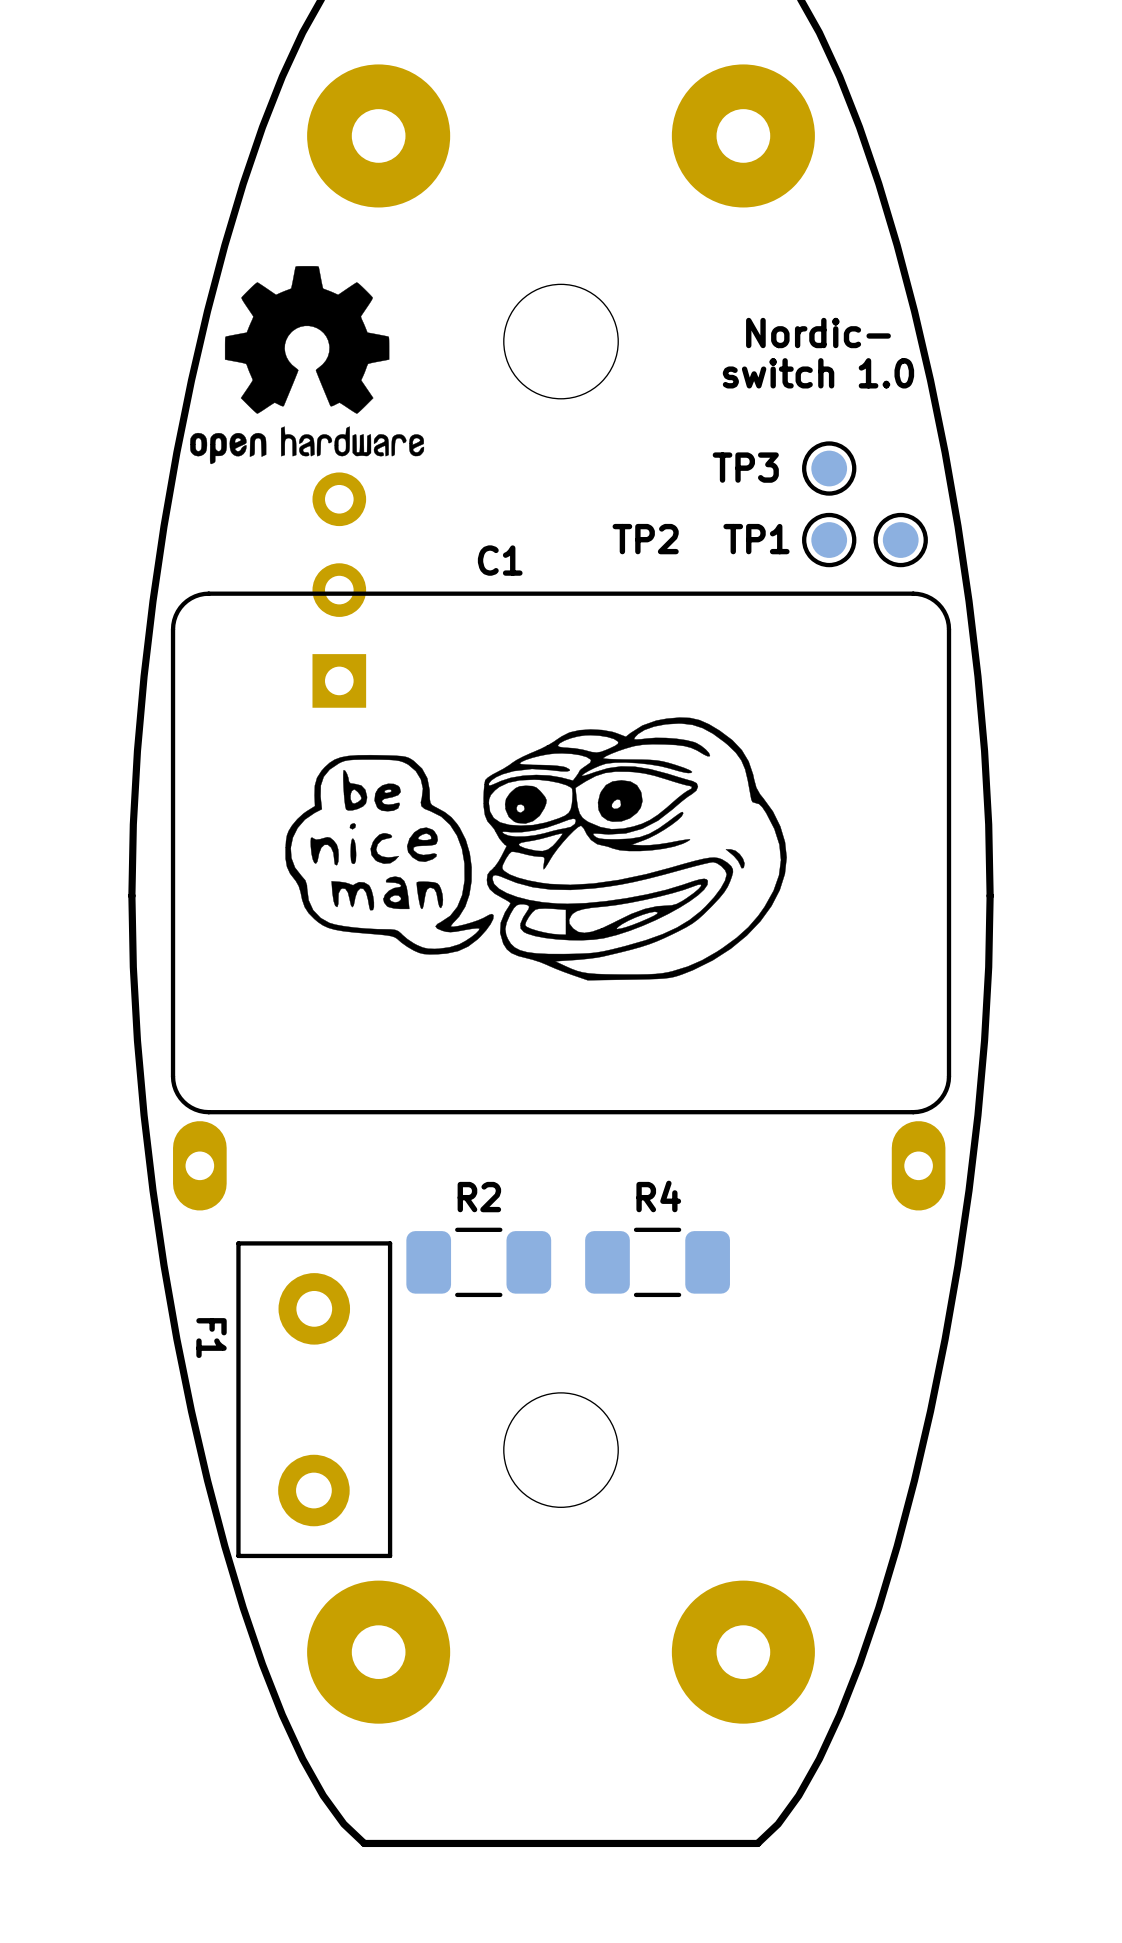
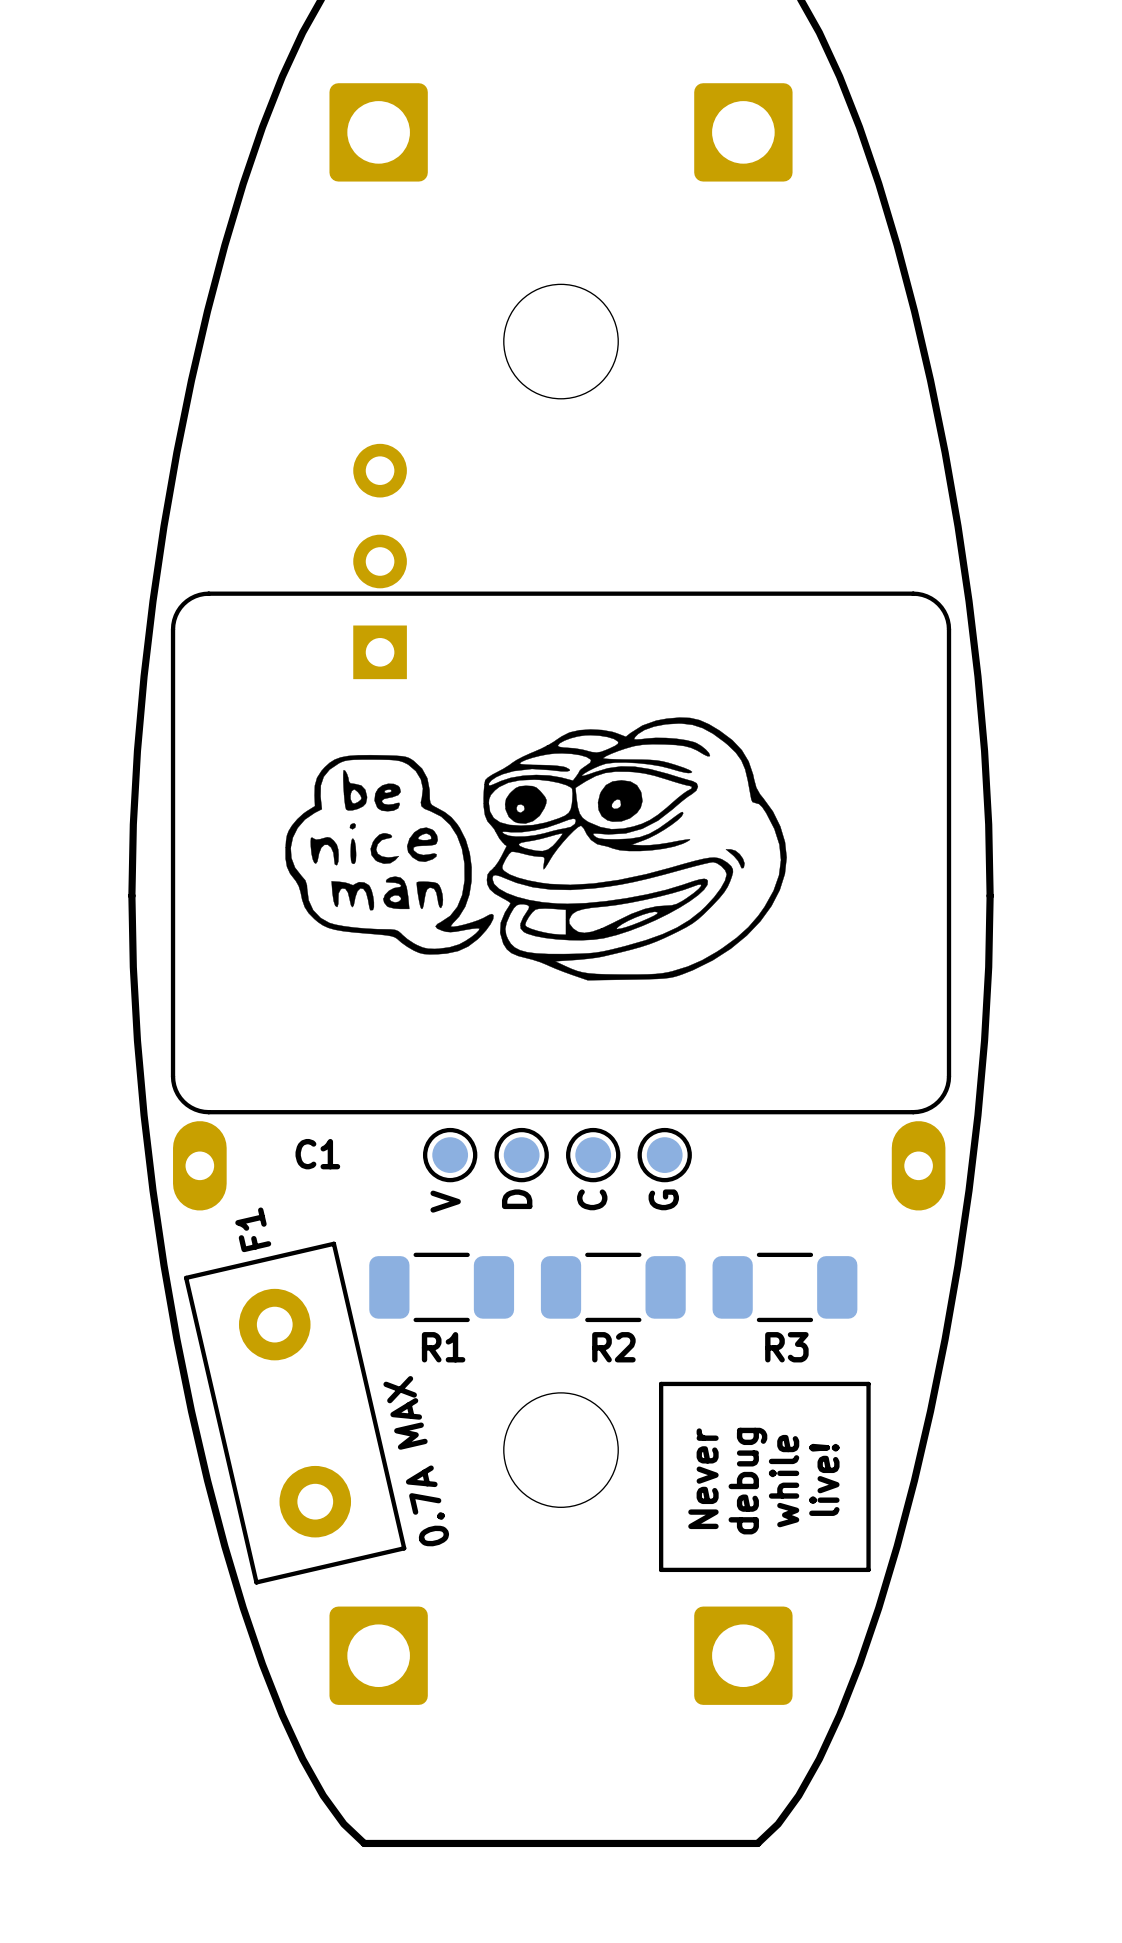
part footprint: [307, 64, 451, 208] -> [329, 83, 428, 182]
part footprint: [671, 64, 815, 208] -> [694, 83, 793, 182]
drawing: [190, 266, 425, 465] -> none
text: Nordic- (818, 333) -> none
text: switch 1.0 (818, 373) -> none
TP3: (829, 468) -> none
TP2: (829, 540) -> none
TP1: (900, 540) -> none
C1 name position: C1 (500, 560) -> C1 (317, 1154)
part position: (339, 590) -> (380, 561)
part: none -> (450, 1155)
part: none -> (521, 1155)
part: none -> (593, 1155)
part: none -> (664, 1155)
R2 name position: R2 (479, 1197) -> R2 (613, 1347)
text: none -> D (517, 1199)
text: none -> C (592, 1199)
text: none -> G (663, 1199)
text: none -> V (445, 1201)
R2 footprint: [406, 1227, 552, 1298] -> [540, 1252, 686, 1323]
R4: (657, 1262) -> none
R1: none -> (441, 1287)
R3: none -> (784, 1287)
F1 name position: F1 (211, 1338) -> F1 (253, 1229)
line: none -> (868, 1383) (661, 1383) (661, 1569) (868, 1569) (868, 1383)
F1 rotation: 0° (314, 1399) -> 13° counterclockwise (295, 1413)
text: none -> 0.7A MAX (416, 1461)
text: none -> Never (703, 1478)
text: none -> live! (824, 1479)
text: none -> debug (747, 1481)
text: none -> while (784, 1481)
part footprint: [307, 1580, 451, 1724] -> [329, 1606, 428, 1705]
part footprint: [671, 1580, 815, 1724] -> [694, 1606, 793, 1705]

